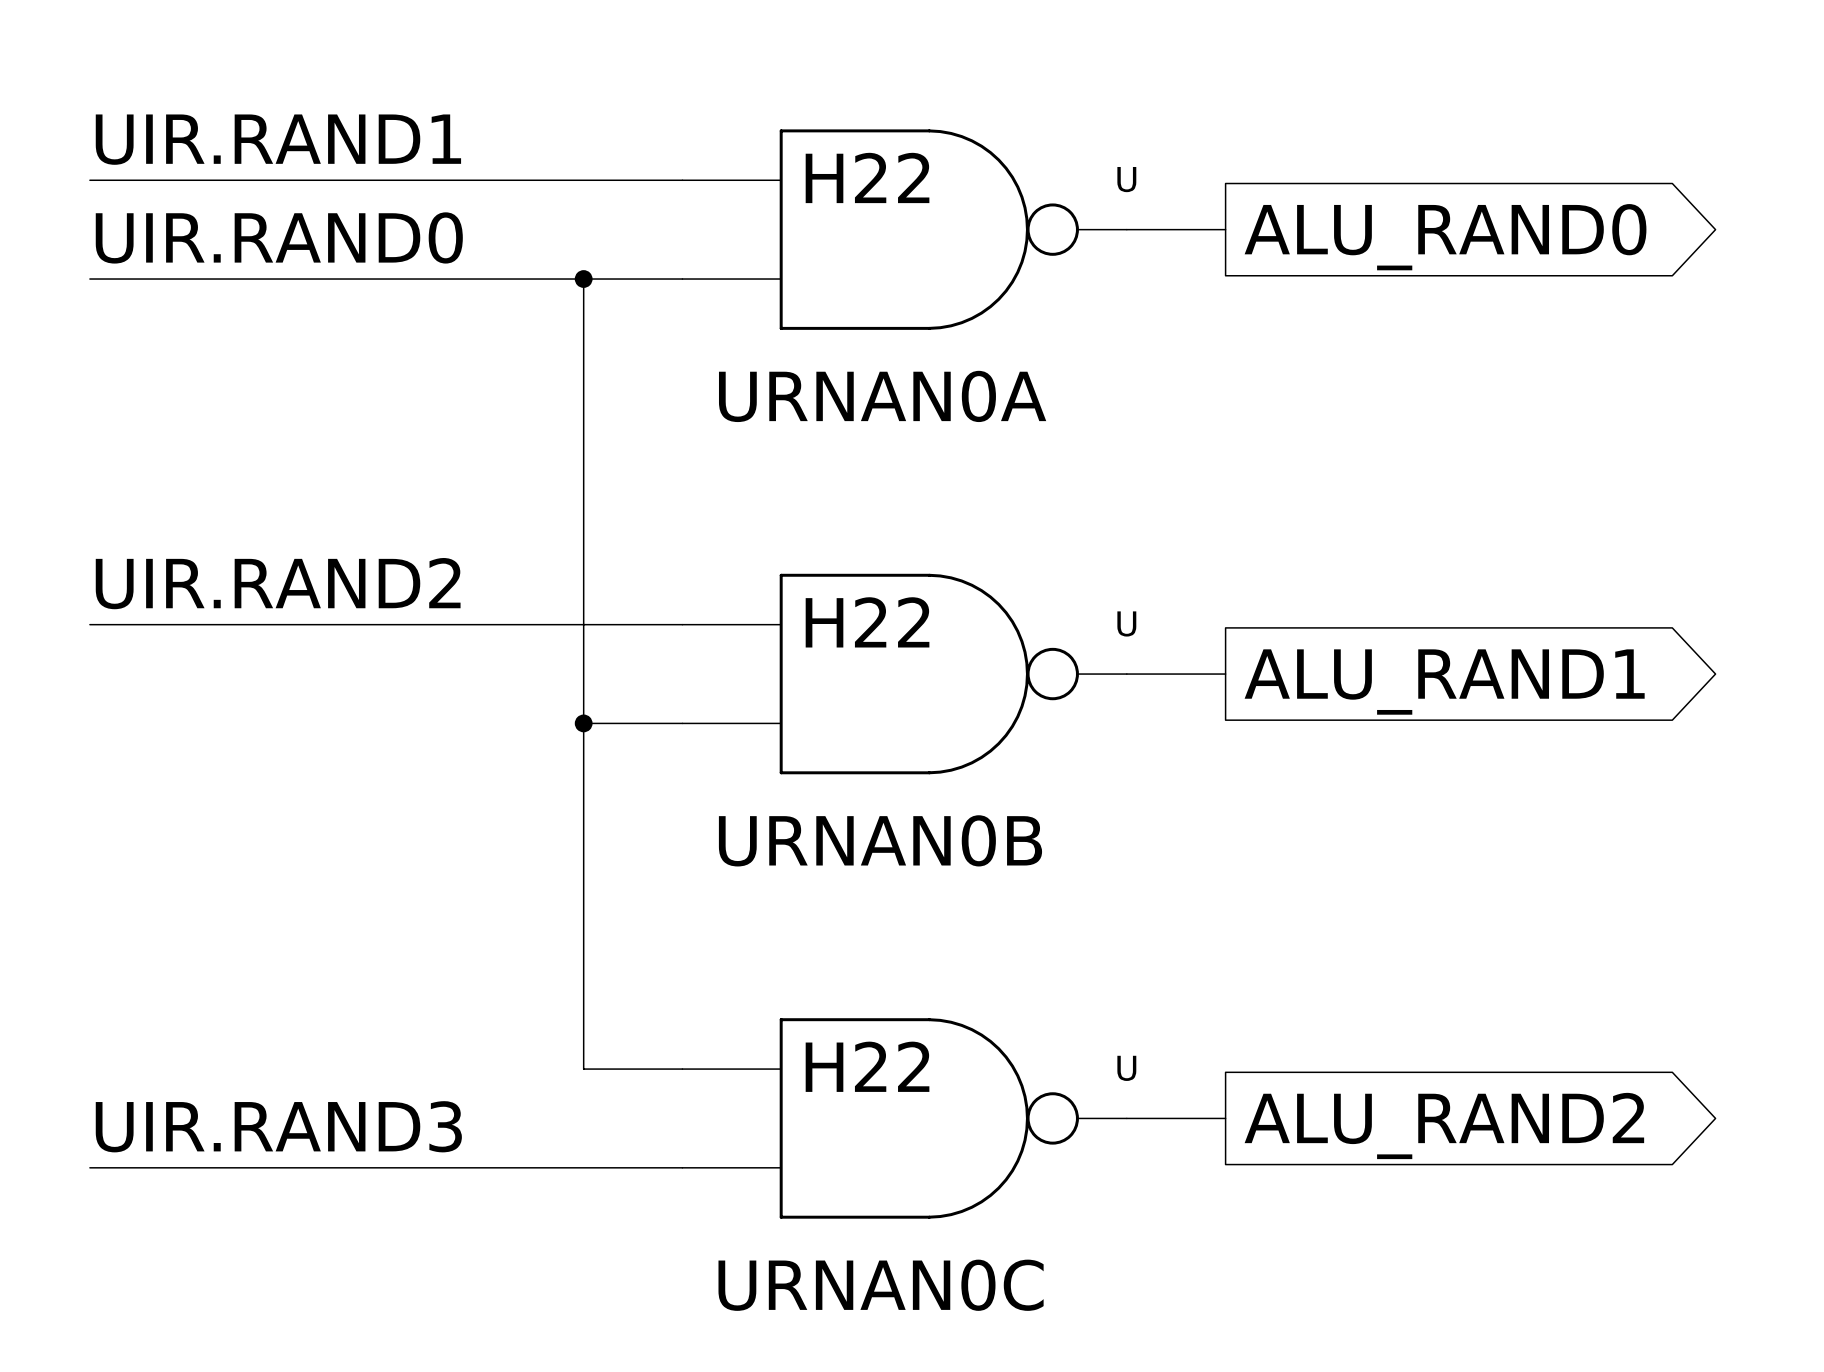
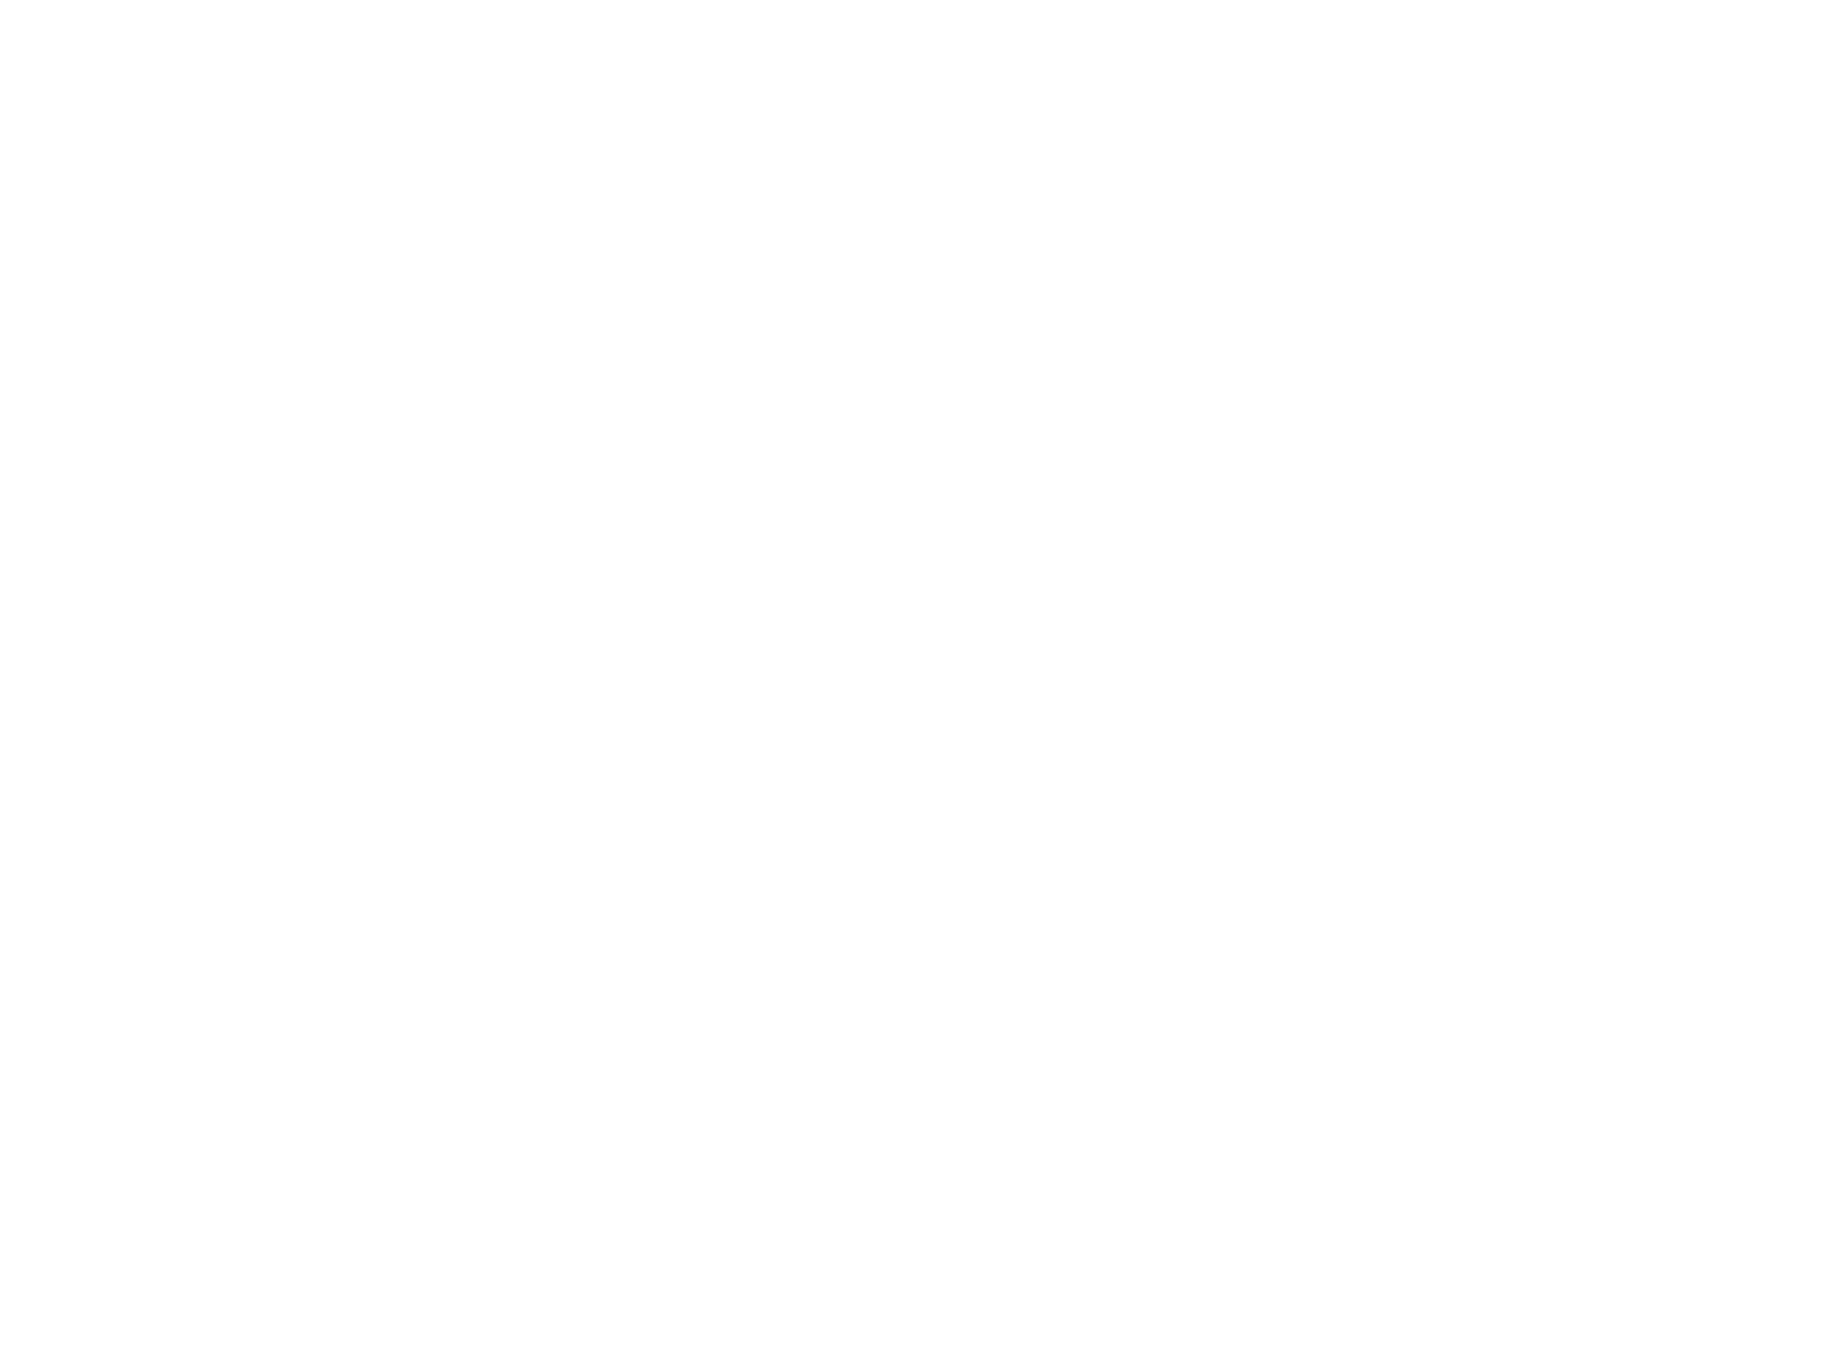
label: UIR.RAND1 (278, 139) -> none
wire: (89, 180) (682, 180) -> none
U: (904, 229) -> none
wire: (1126, 229) (1225, 229) -> none
label: UIR.RAND0 (279, 237) -> none
global label: ALU_RAND0 (1445, 237) -> none
wire: (89, 279) (682, 279) -> none
wire: (583, 279) (583, 1069) (682, 1069) -> none
junction: (583, 279) -> none
label: UIR.RAND2 (278, 583) -> none
wire: (89, 624) (682, 624) -> none
U: (904, 674) -> none
wire: (1126, 674) (1225, 674) -> none
global label: ALU_RAND1 (1444, 682) -> none
wire: (583, 723) (682, 723) -> none
junction: (583, 723) -> none
U: (904, 1118) -> none
wire: (1126, 1118) (1225, 1118) -> none
global label: ALU_RAND2 (1444, 1125) -> none
label: UIR.RAND3 (278, 1126) -> none
wire: (89, 1167) (682, 1167) -> none

